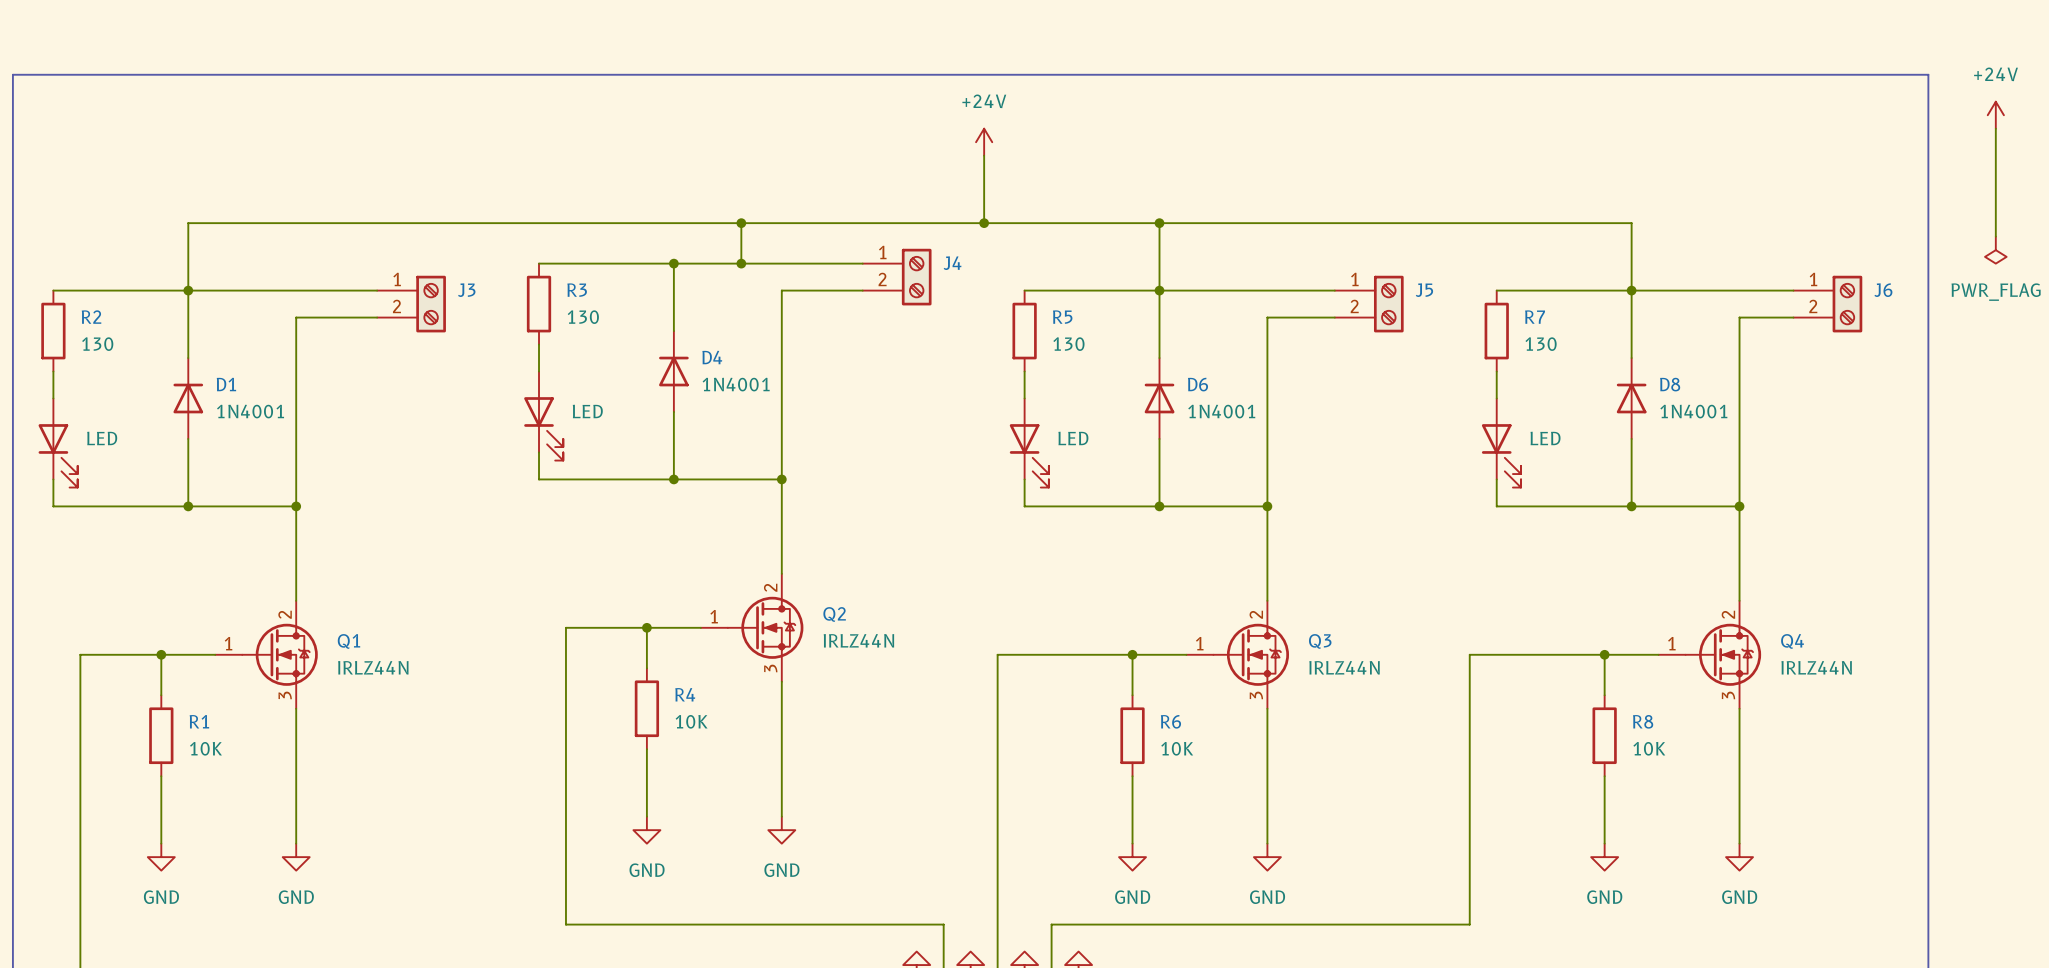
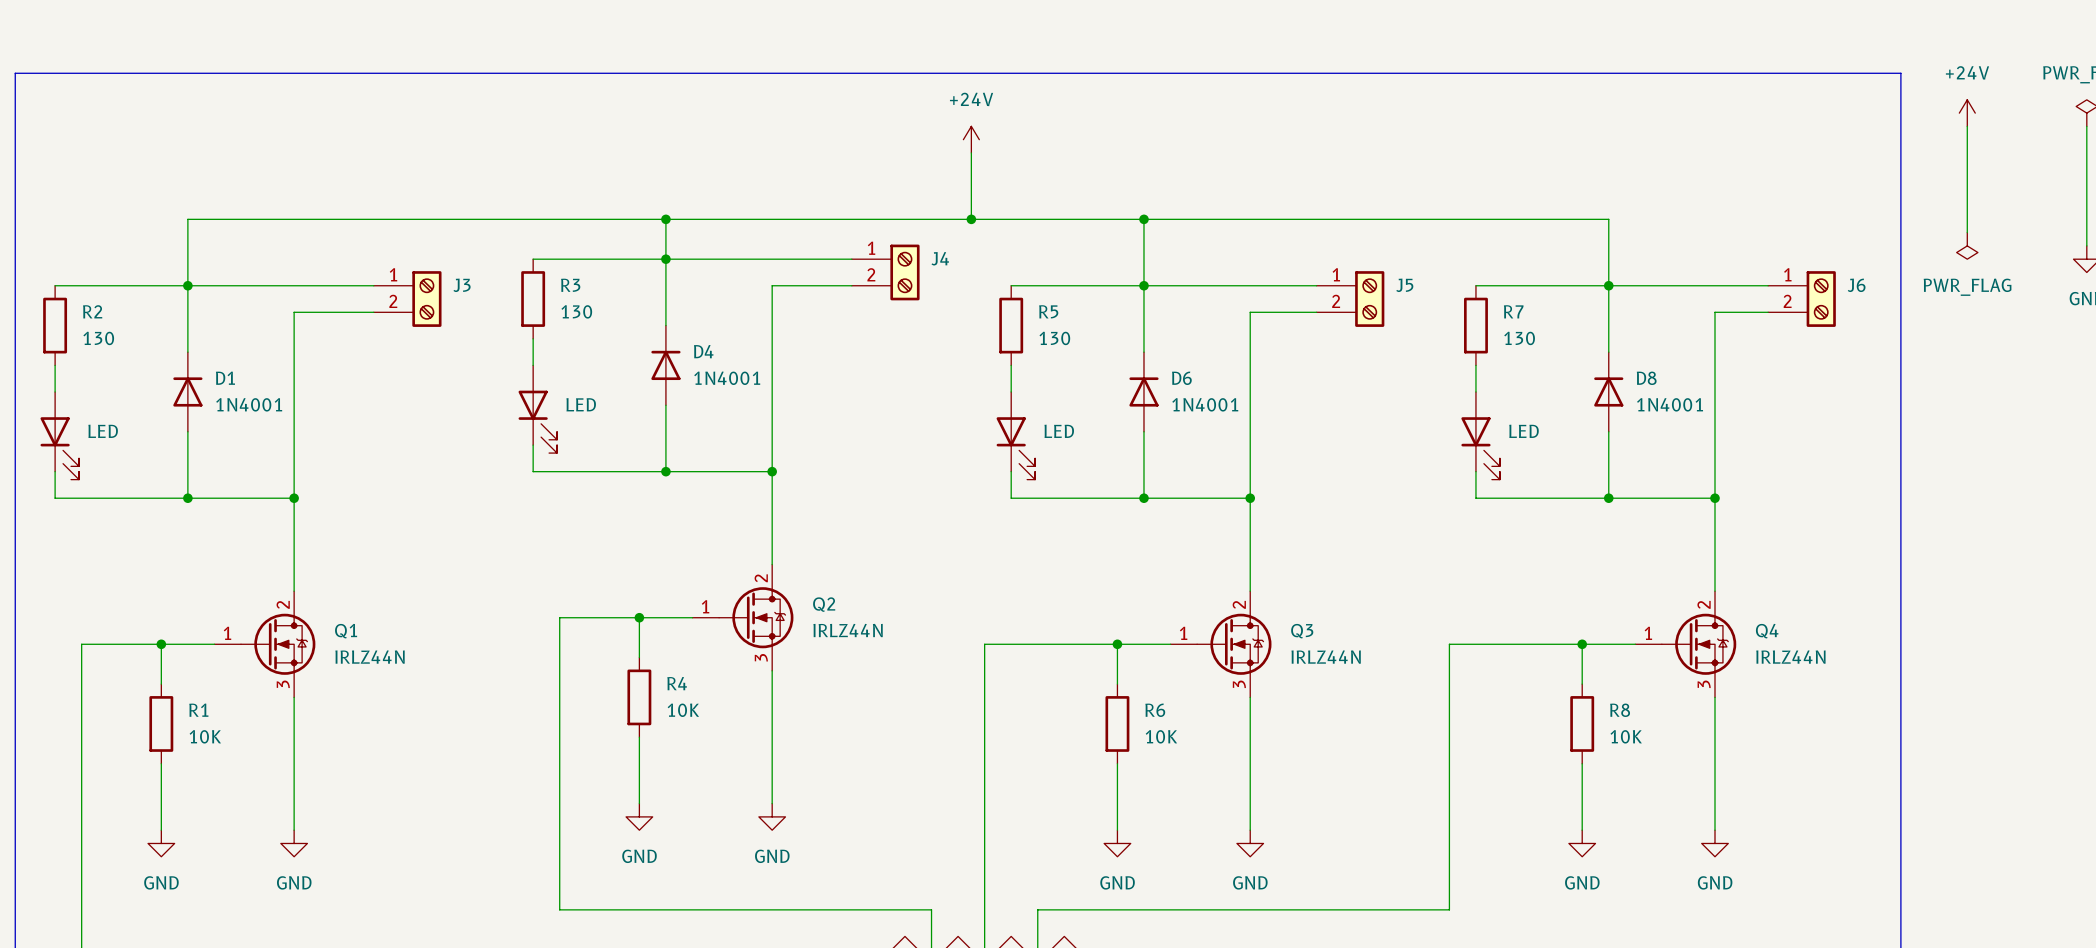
junction: none -> (665, 219)
wire: (741, 223) (741, 263) -> (665, 219) (665, 259)
junction: (741, 223) -> none
junction: (741, 263) -> none

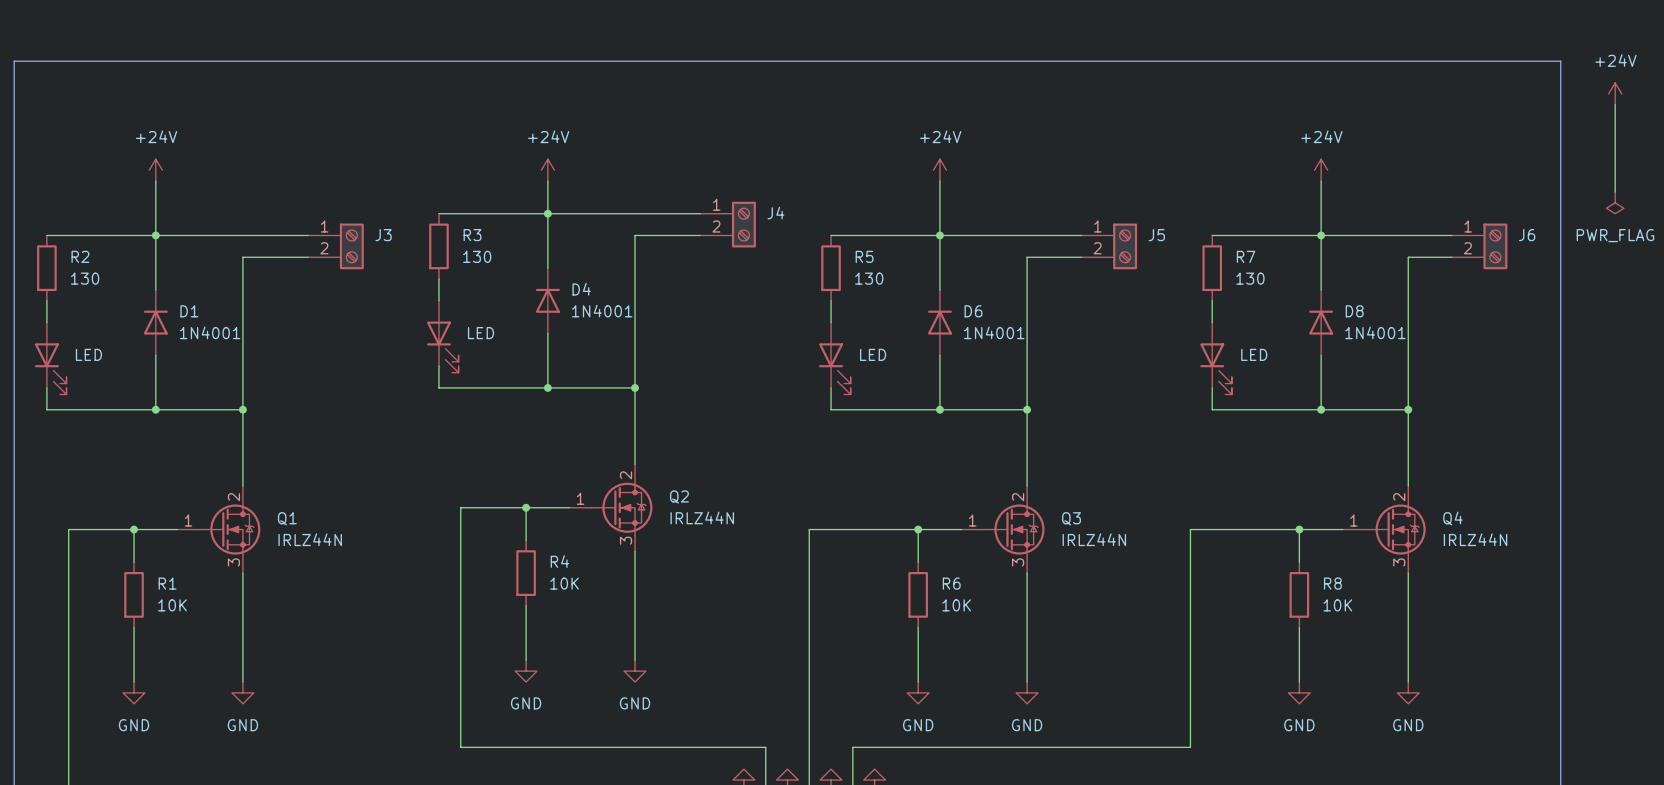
power symbol: +24V (971, 139) -> none
wire: (971, 152) (971, 219) -> none
power symbol: none -> +24V (155, 170)
power symbol: none -> +24V (547, 170)
power symbol: none -> +24V (939, 170)
power symbol: none -> +24V (1321, 170)
wire: (187, 219) (1608, 219) -> none
junction: (665, 219) -> none
junction: (971, 219) -> none
junction: (1143, 219) -> none

